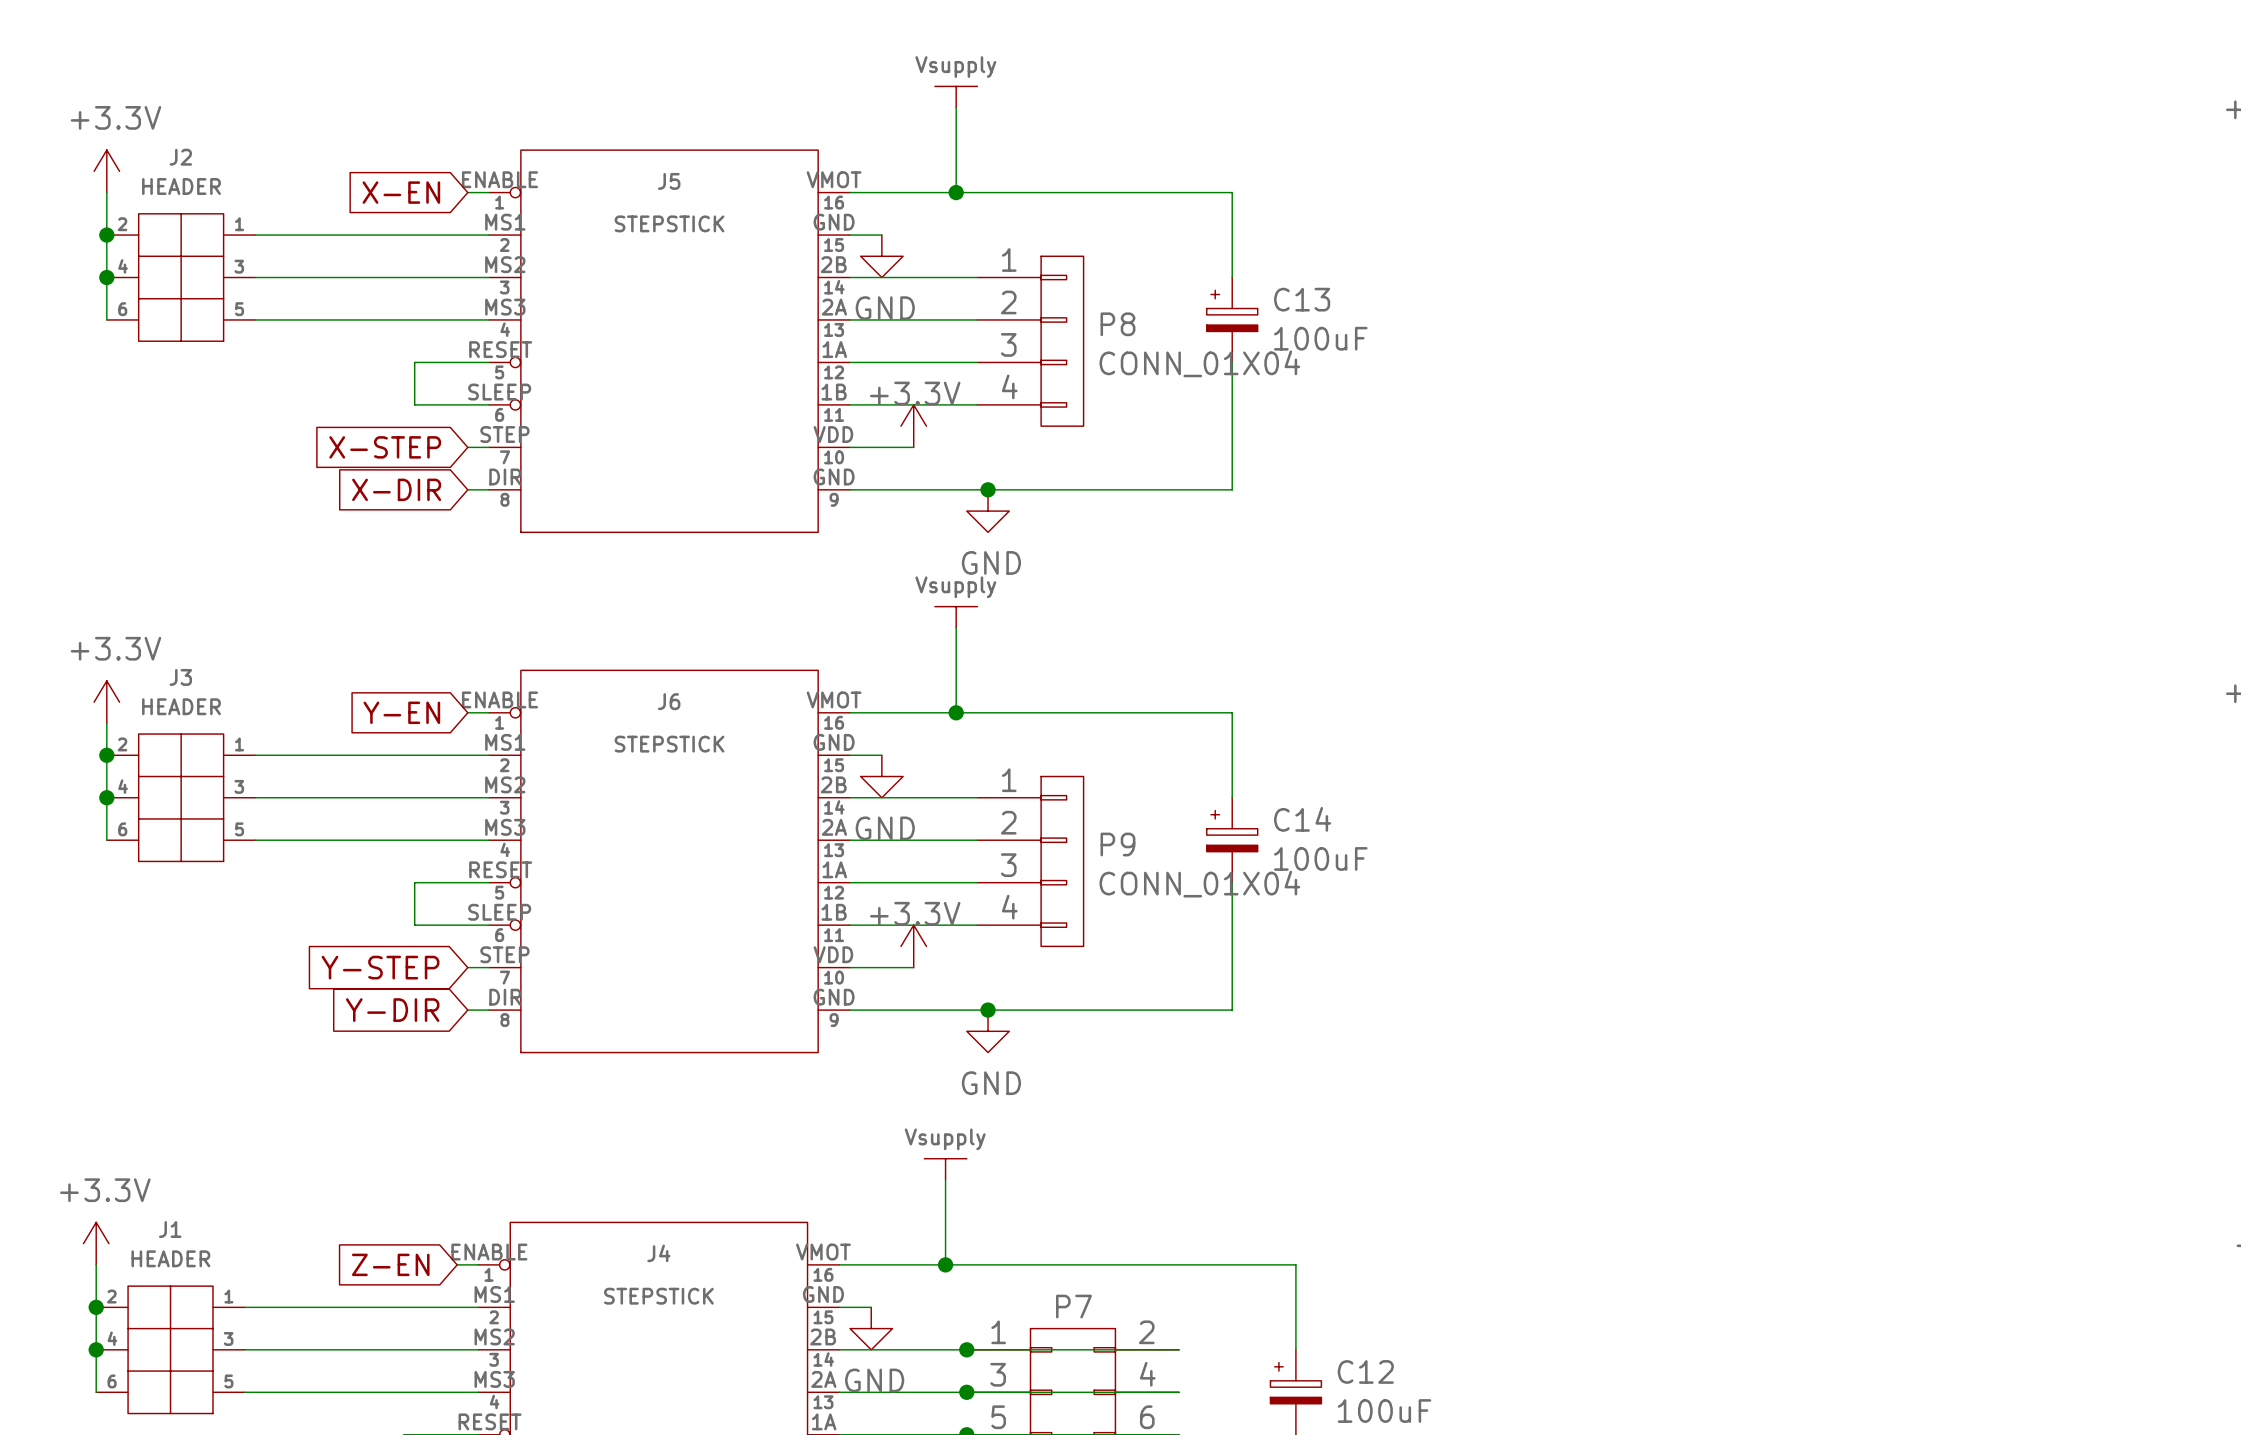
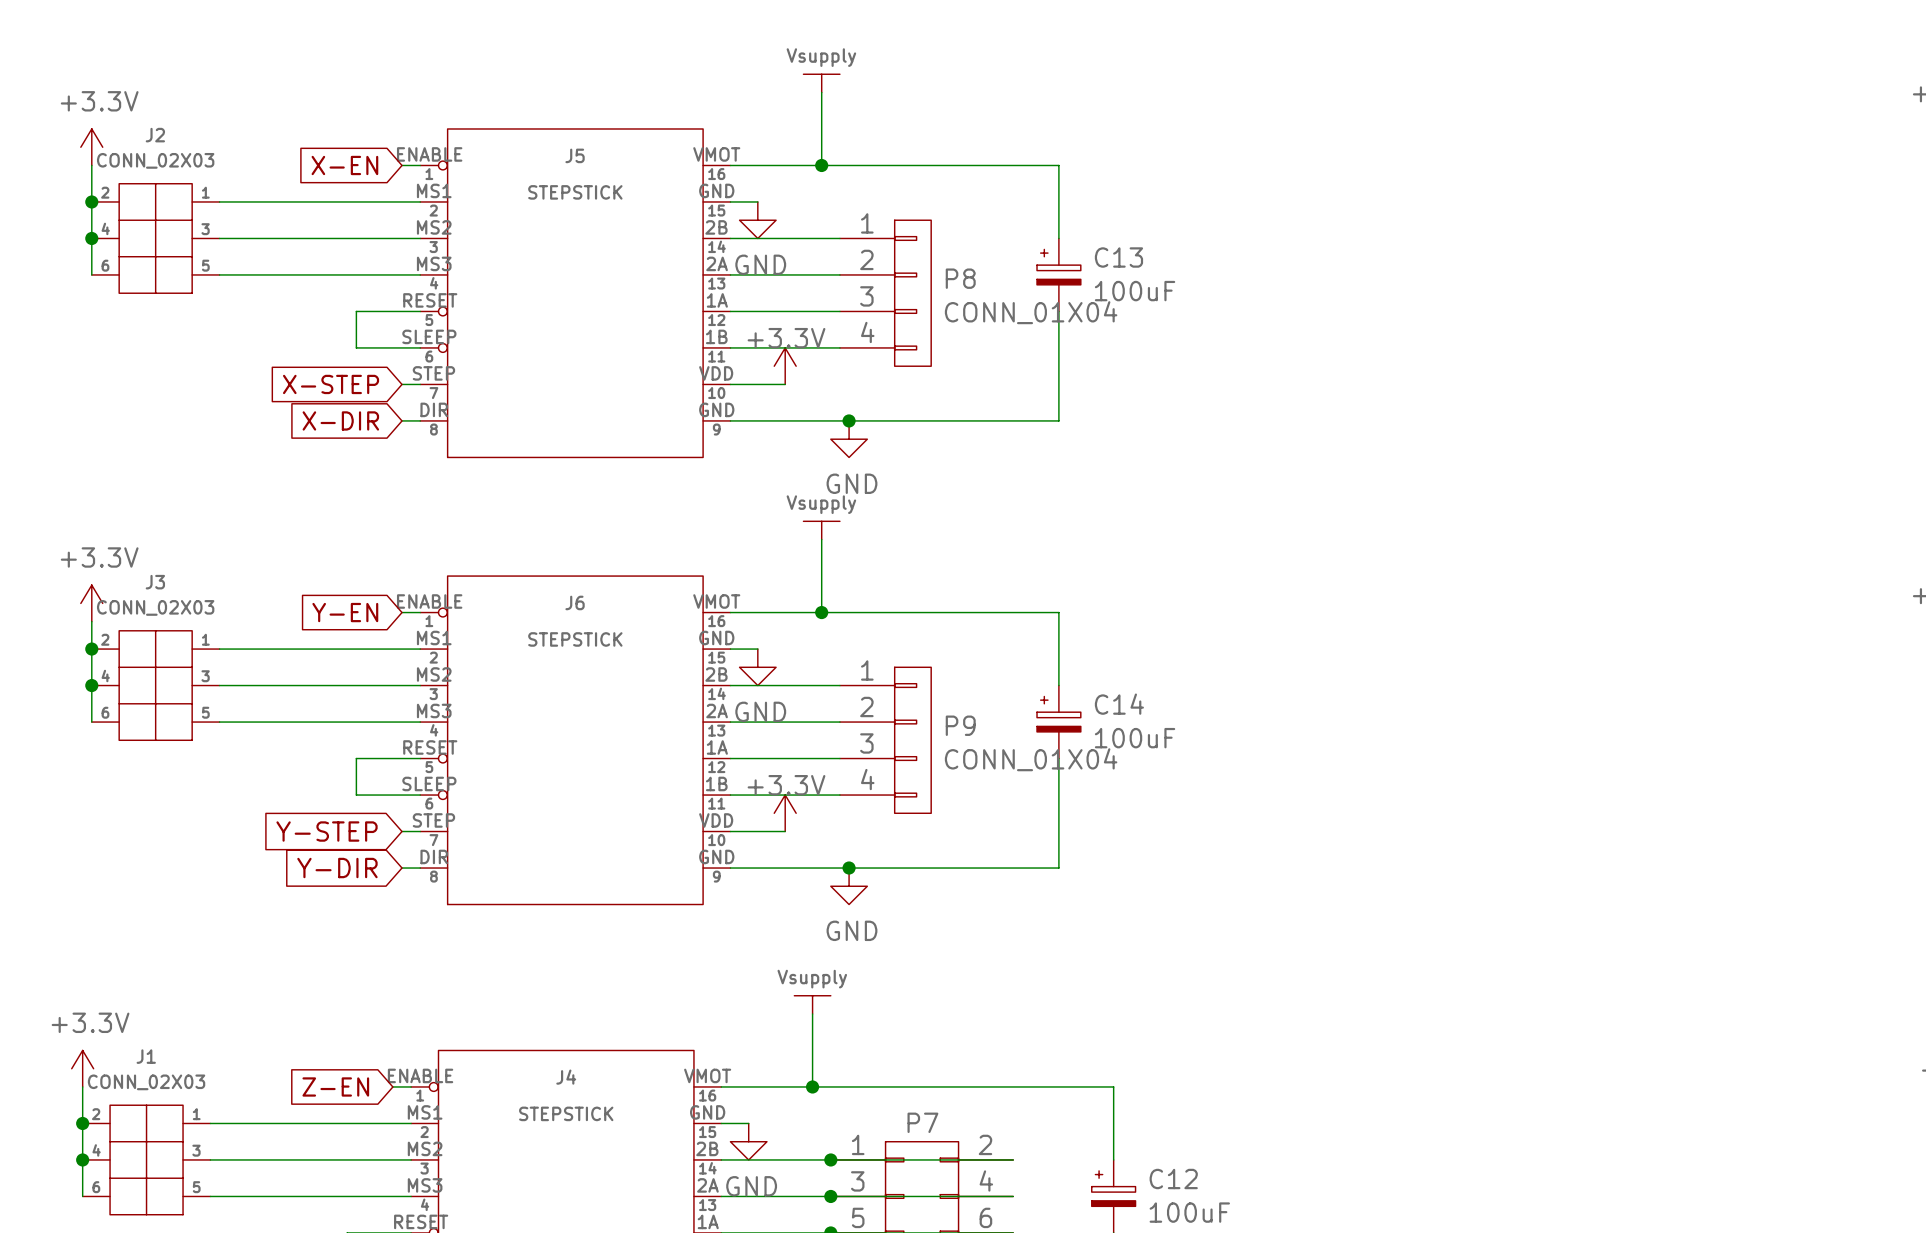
J2 value: HEADER (181, 186) -> CONN_02X03 (155, 160)
J3 value: HEADER (181, 706) -> CONN_02X03 (155, 607)
J1 value: HEADER (170, 1258) -> CONN_02X03 (146, 1082)

